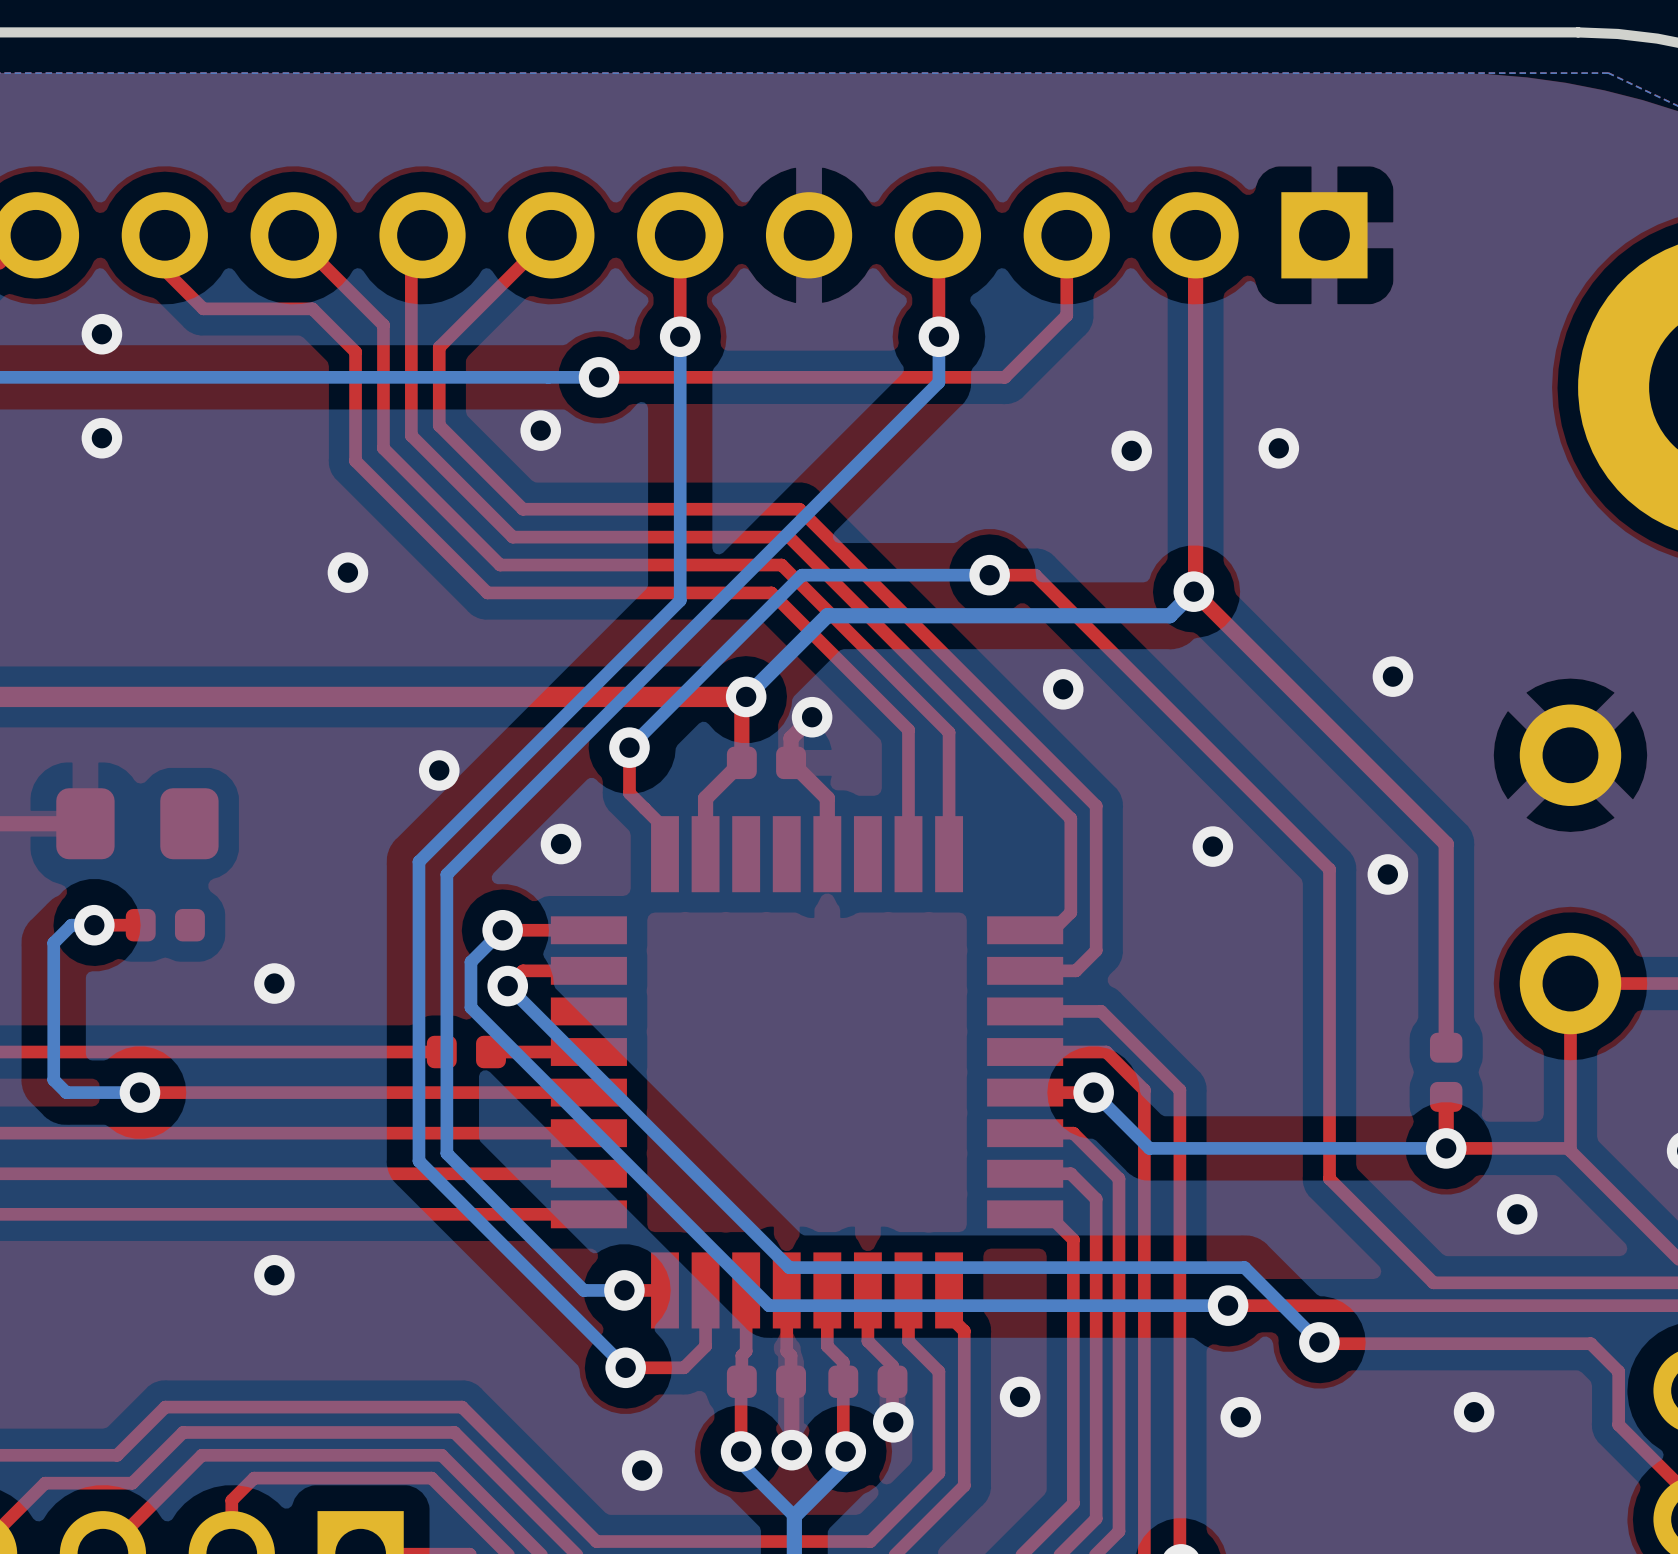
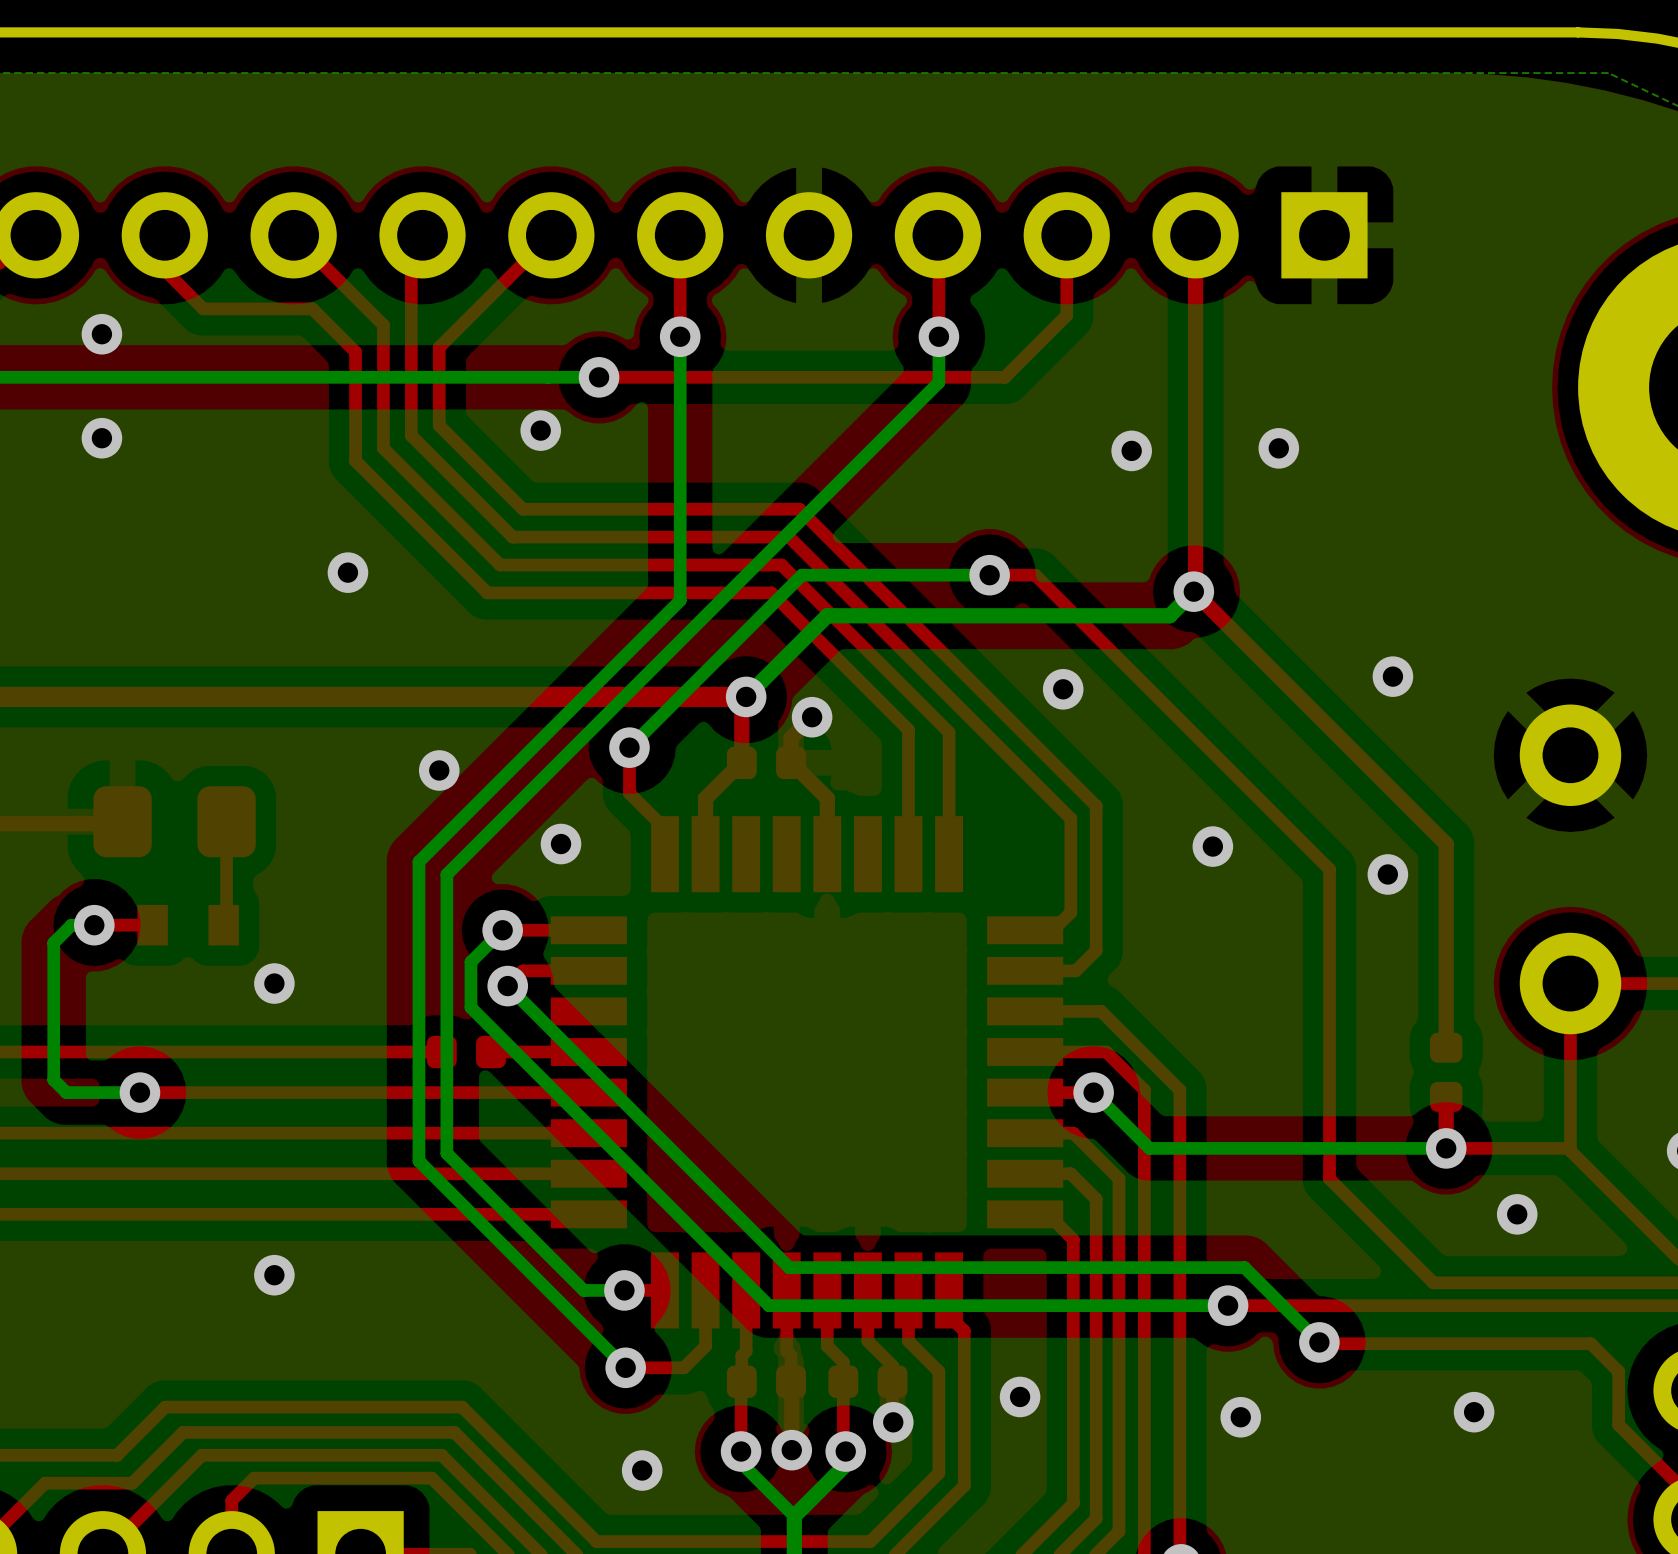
top track: none -> (226, 821) (226, 922) (223, 925)
part position: (137, 823) -> (174, 821)
part footprint: [125, 908, 205, 942] -> [137, 904, 239, 946]

